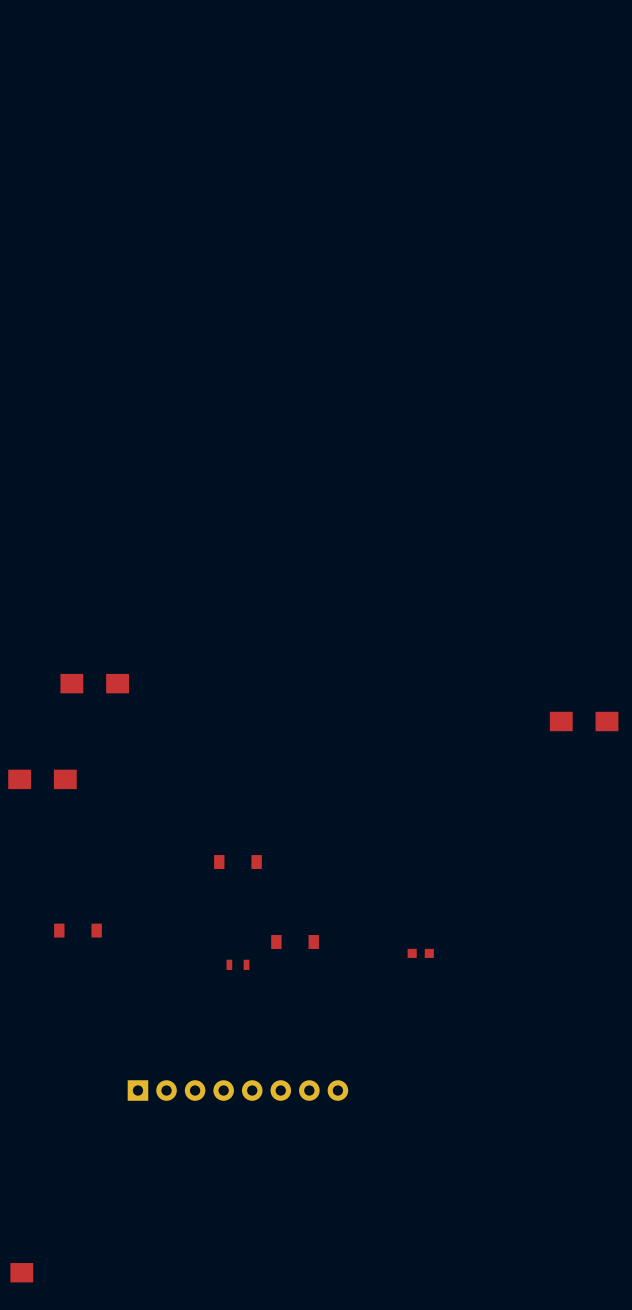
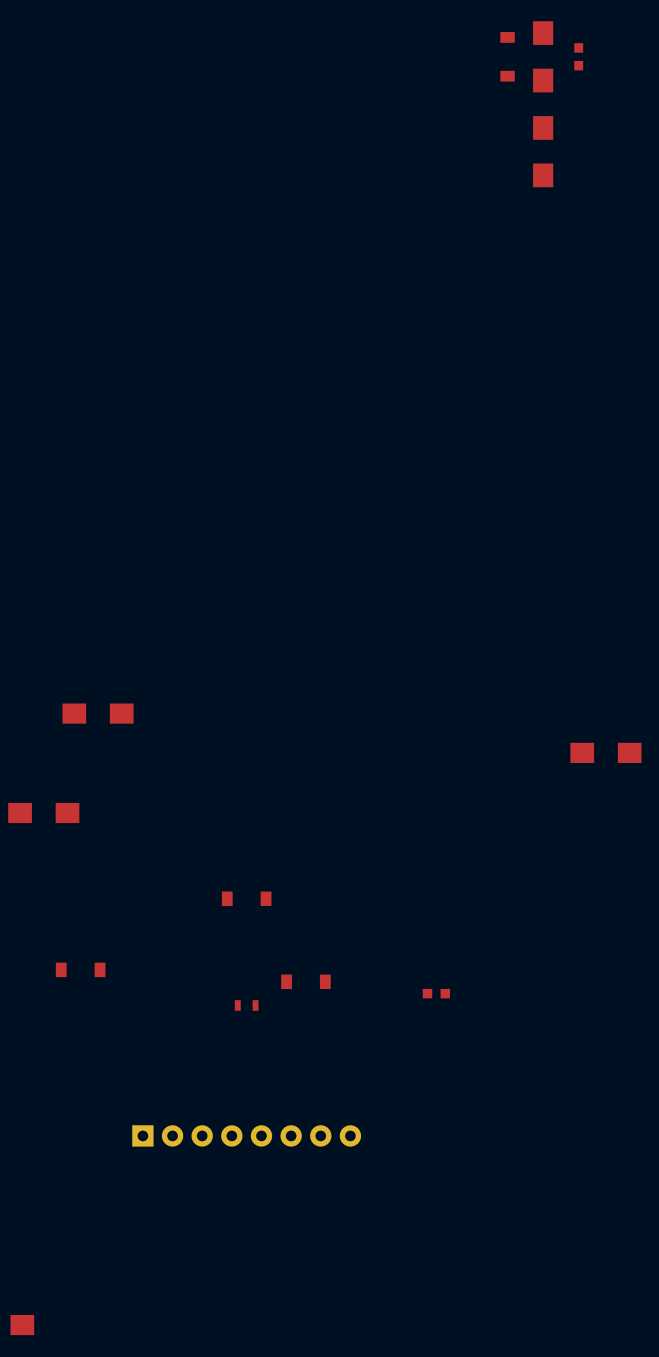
part: none -> (507, 56)
part: none -> (543, 56)
part: none -> (578, 56)
part: none -> (543, 151)

